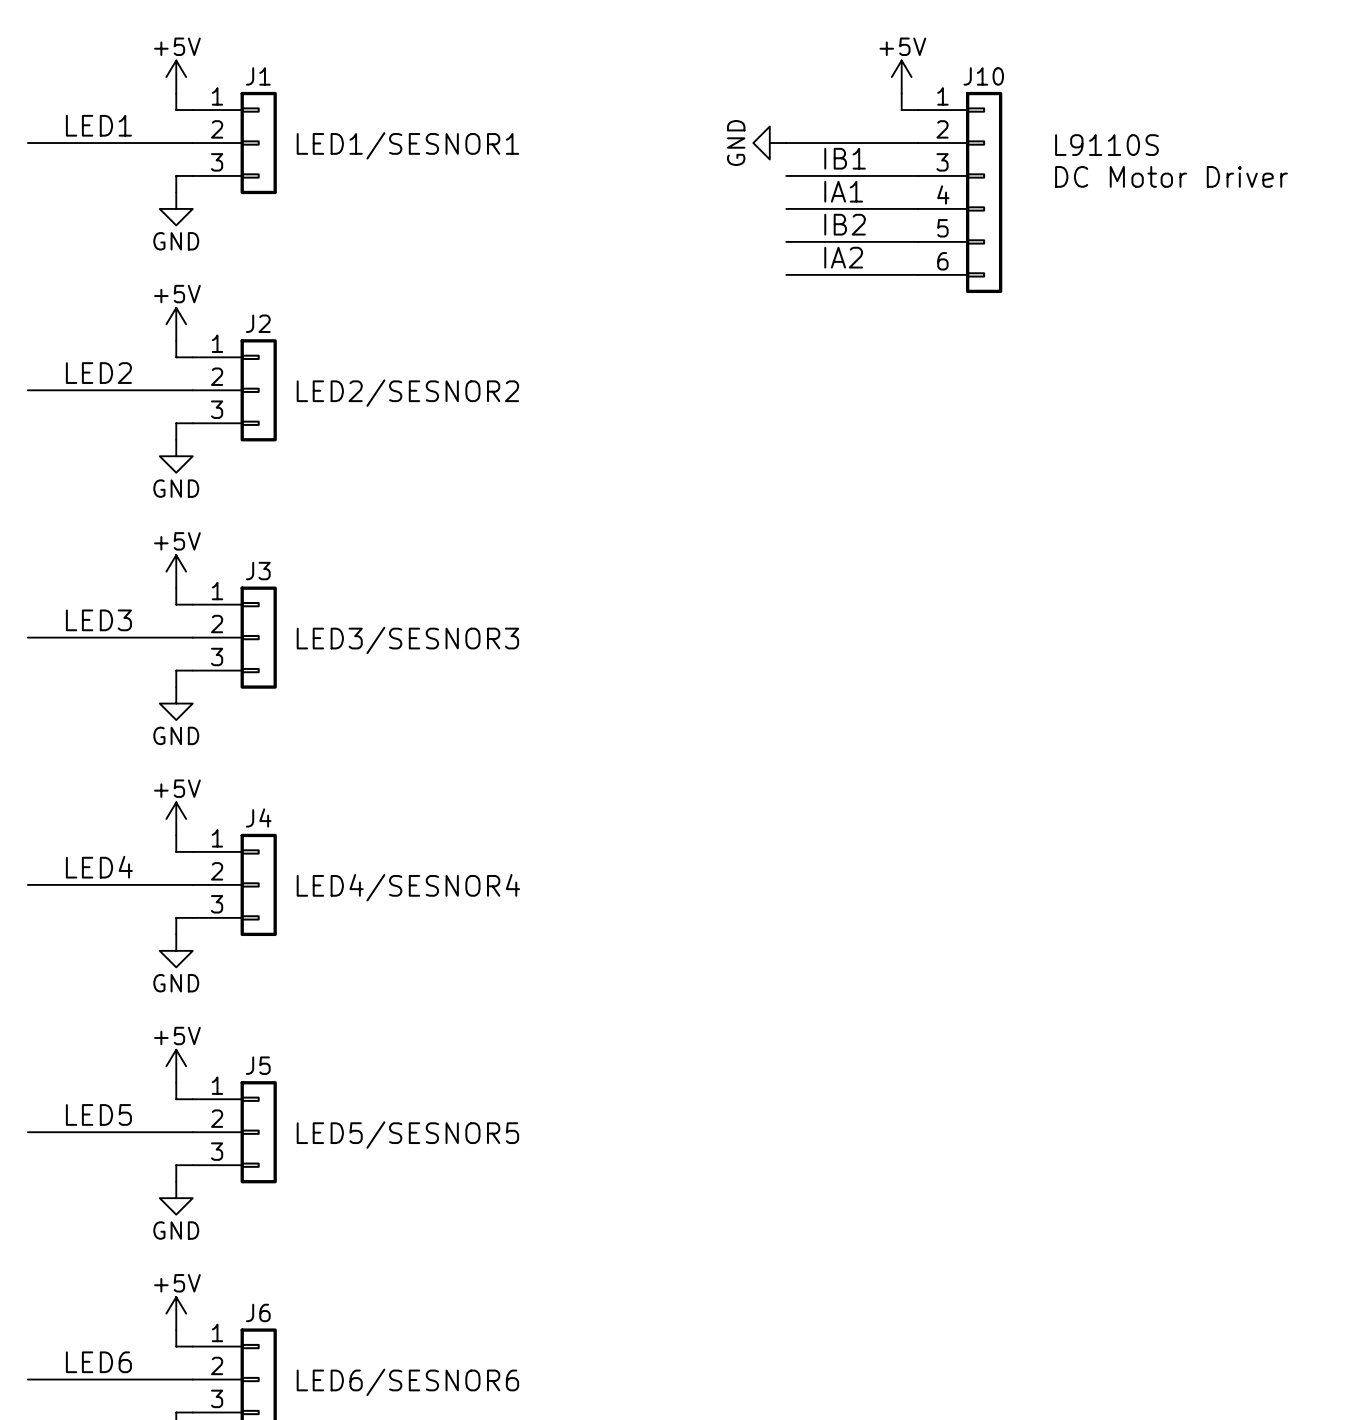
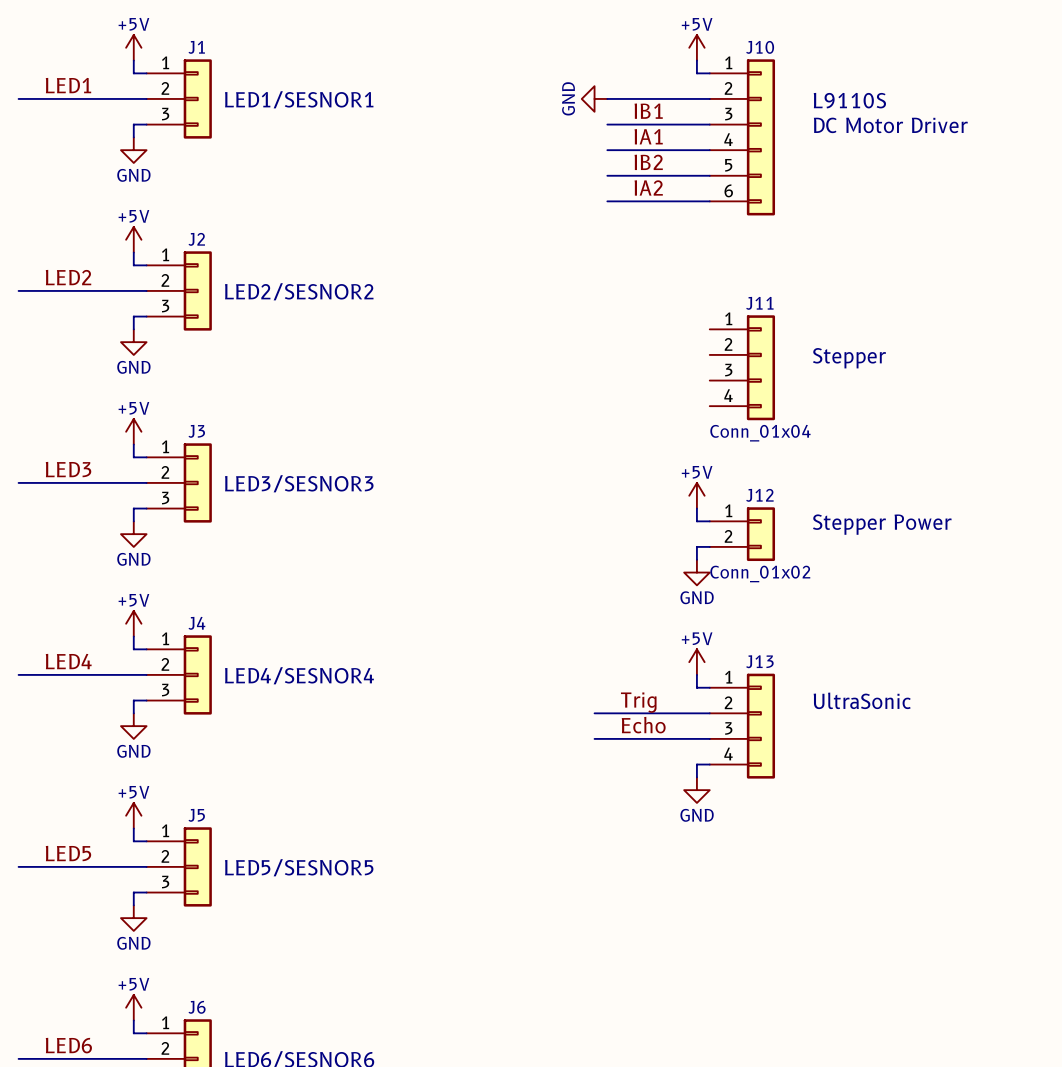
text: none -> Stepper (849, 358)
J11: none -> Conn_01x04 (742, 367)
power symbol: none -> +5V (696, 495)
wire: none -> (696, 508) (696, 521) (709, 521)
text: none -> Stepper Power (882, 524)
J12: none -> Conn_01x02 (742, 534)
wire: none -> (709, 546) (696, 546) (696, 559)
power symbol: none -> GND (696, 572)
power symbol: none -> +5V (696, 662)
wire: none -> (696, 674) (696, 687) (709, 687)
text: none -> UltraSonic (862, 700)
label: none -> Trig (638, 702)
wire: none -> (594, 713) (709, 713)
label: none -> Echo (643, 725)
J13: none -> (742, 726)
wire: none -> (594, 738) (709, 738)
wire: none -> (709, 764) (696, 764) (696, 777)
power symbol: none -> GND (696, 790)

